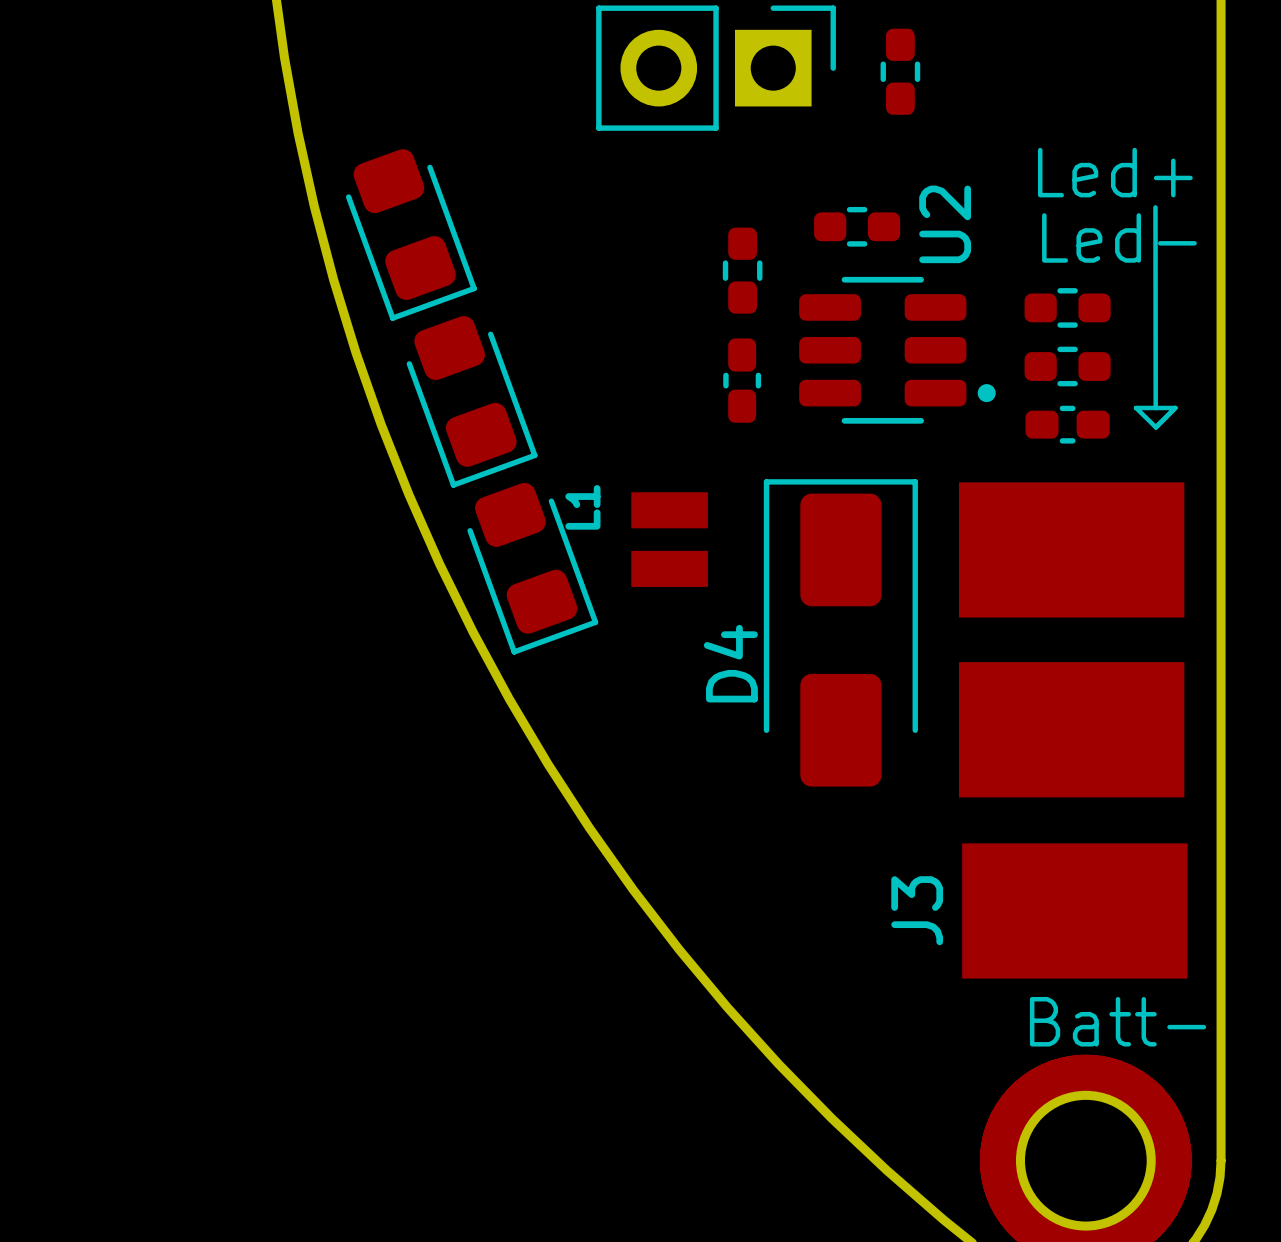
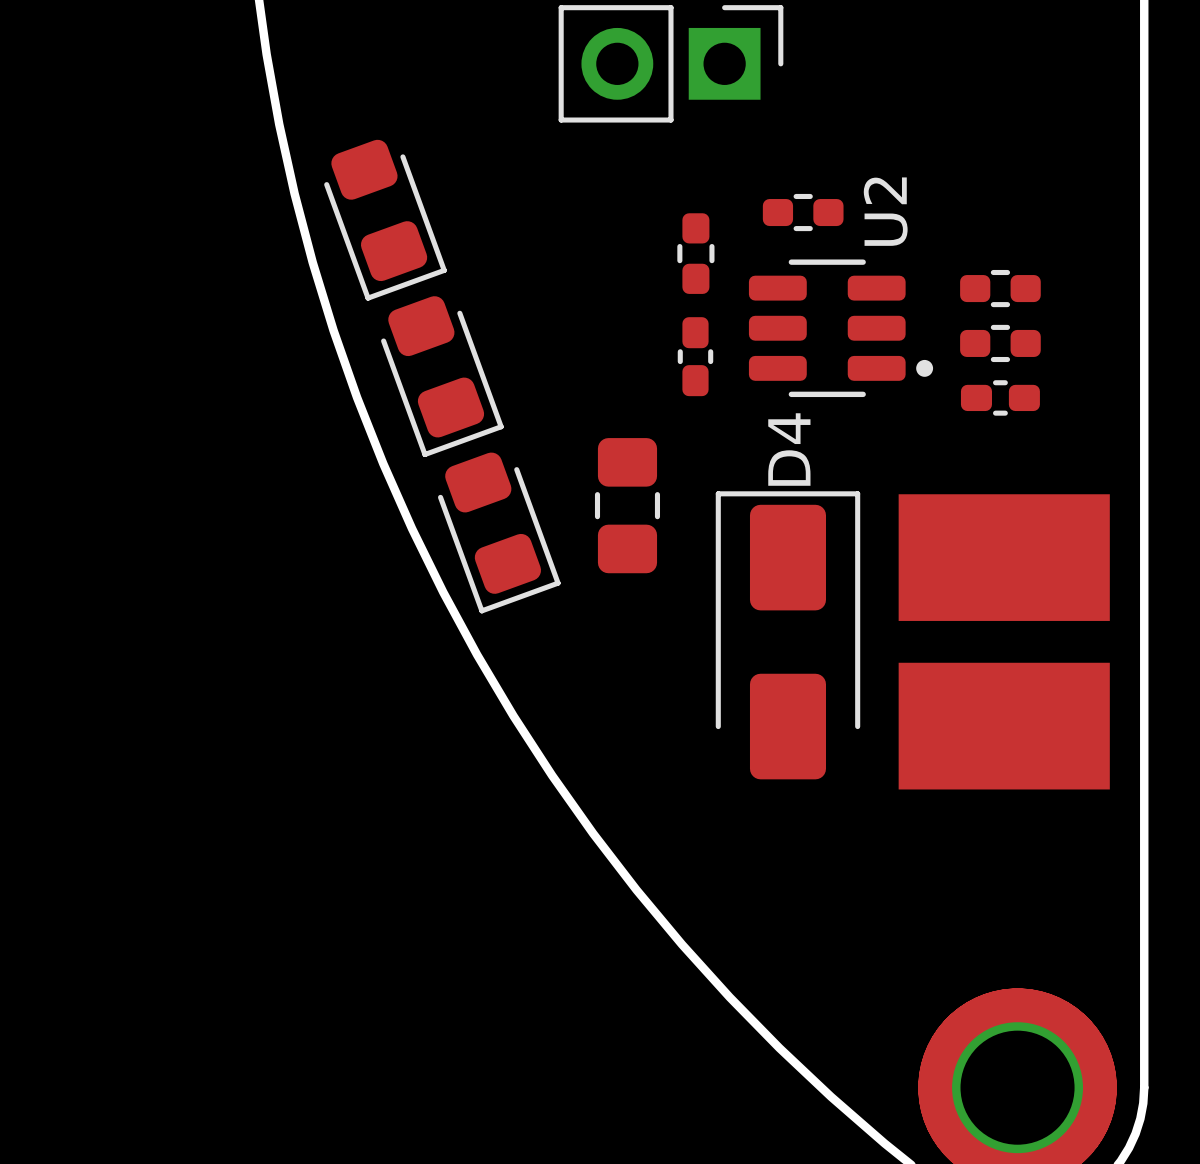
part: (900, 71) -> none
text: Led+ (1115, 172) -> none
line: (1155, 207) (1155, 407) -> none
text: Led- (1119, 237) -> none
line: (1136, 407) (1155, 427) (1175, 407) (1136, 407) -> none
L1: (669, 539) -> none
part: none -> (627, 505)
part position: (1071, 549) -> (1004, 557)
D4 position: (840, 632) -> (787, 635)
D4 name position: D4 (730, 663) -> D4 (789, 449)
part position: (1071, 729) -> (1004, 726)
J3: (1074, 910) -> none
text: Batt- (1118, 1021) -> none

